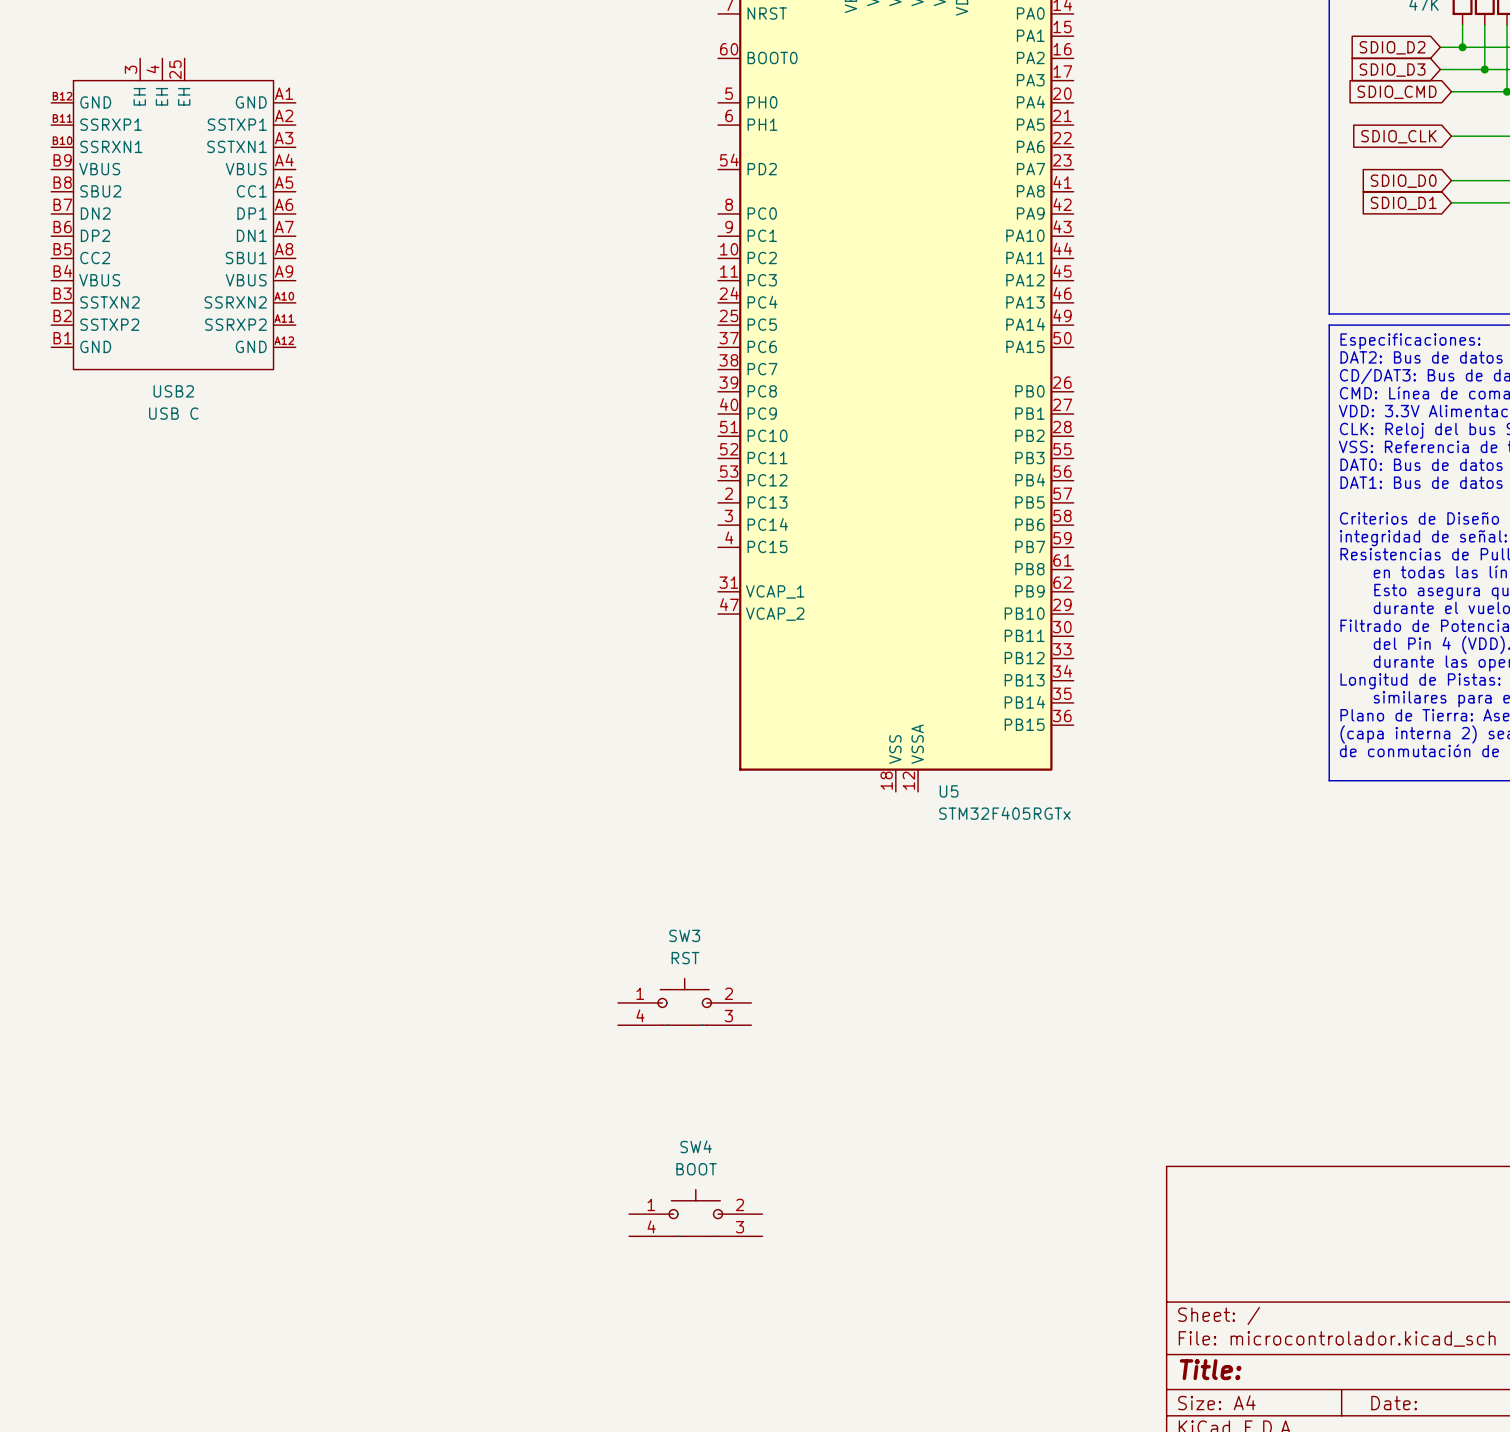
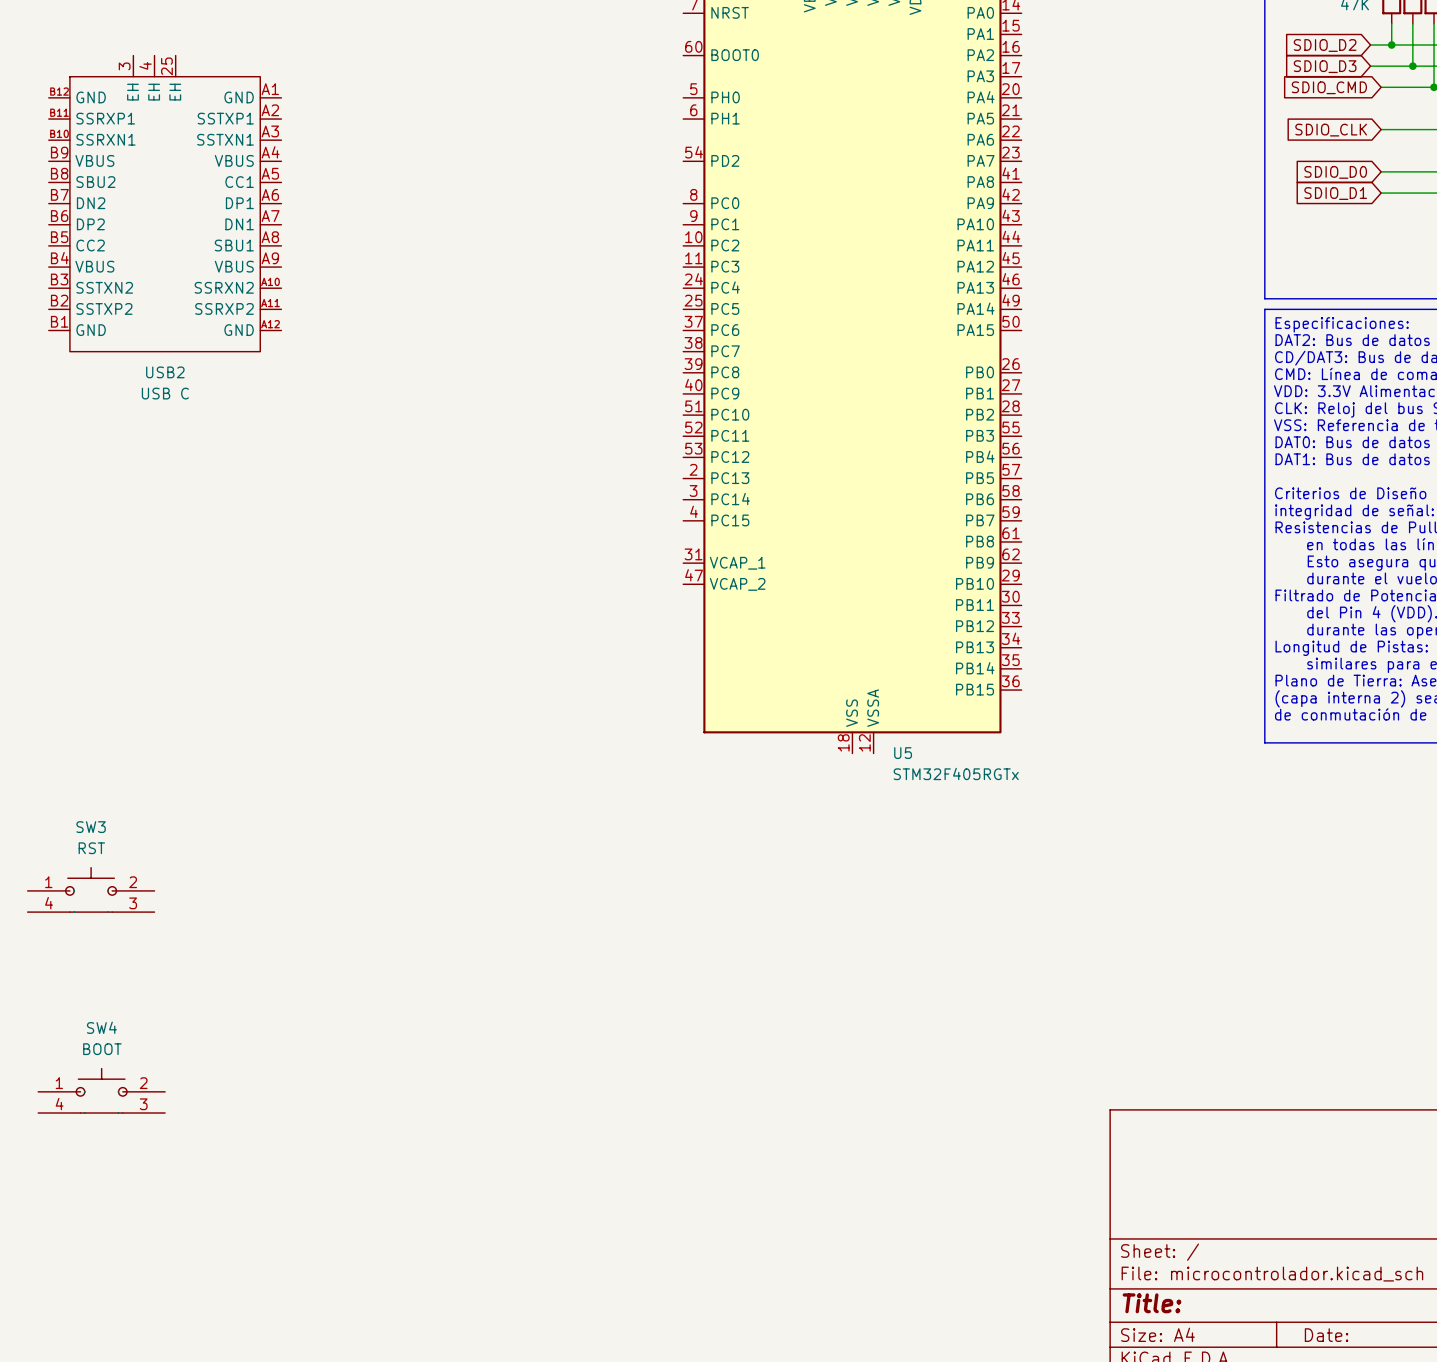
SW3 position: (684, 1001) -> (91, 889)
SW4 position: (695, 1213) -> (101, 1090)

